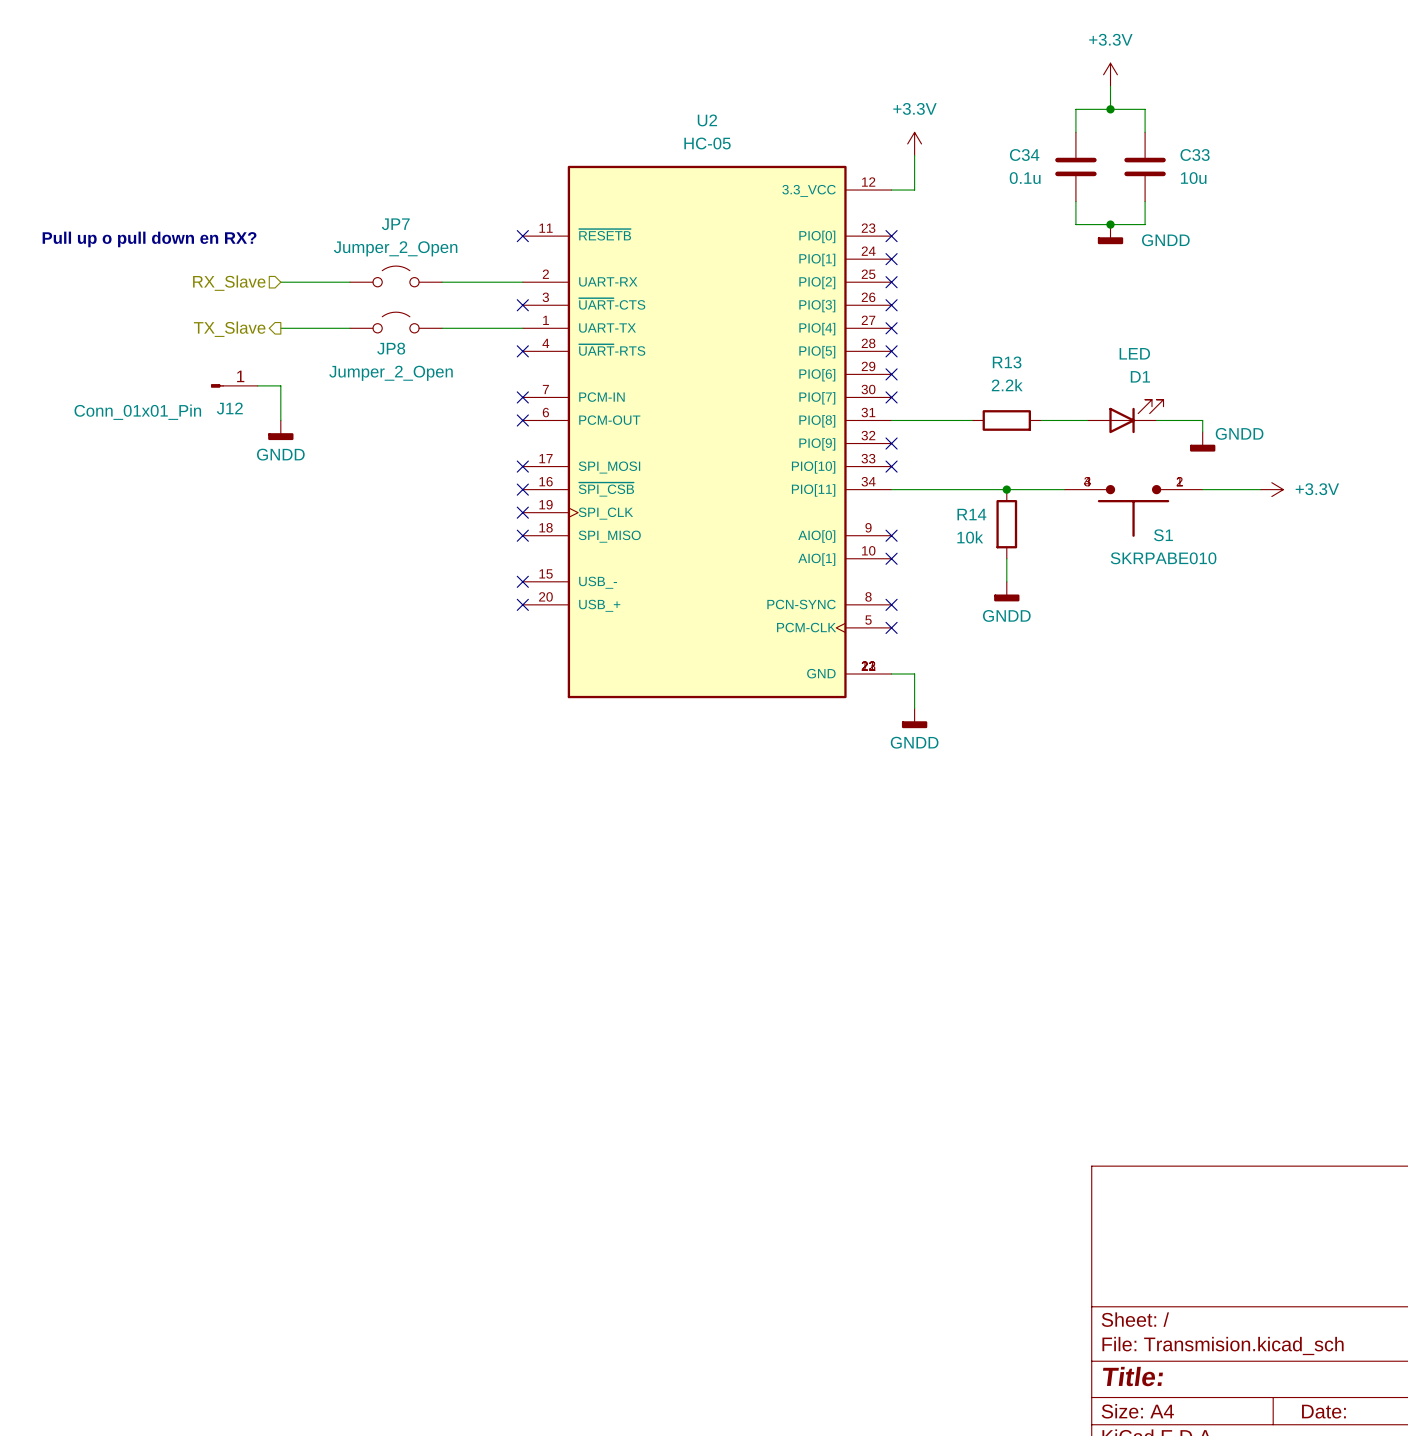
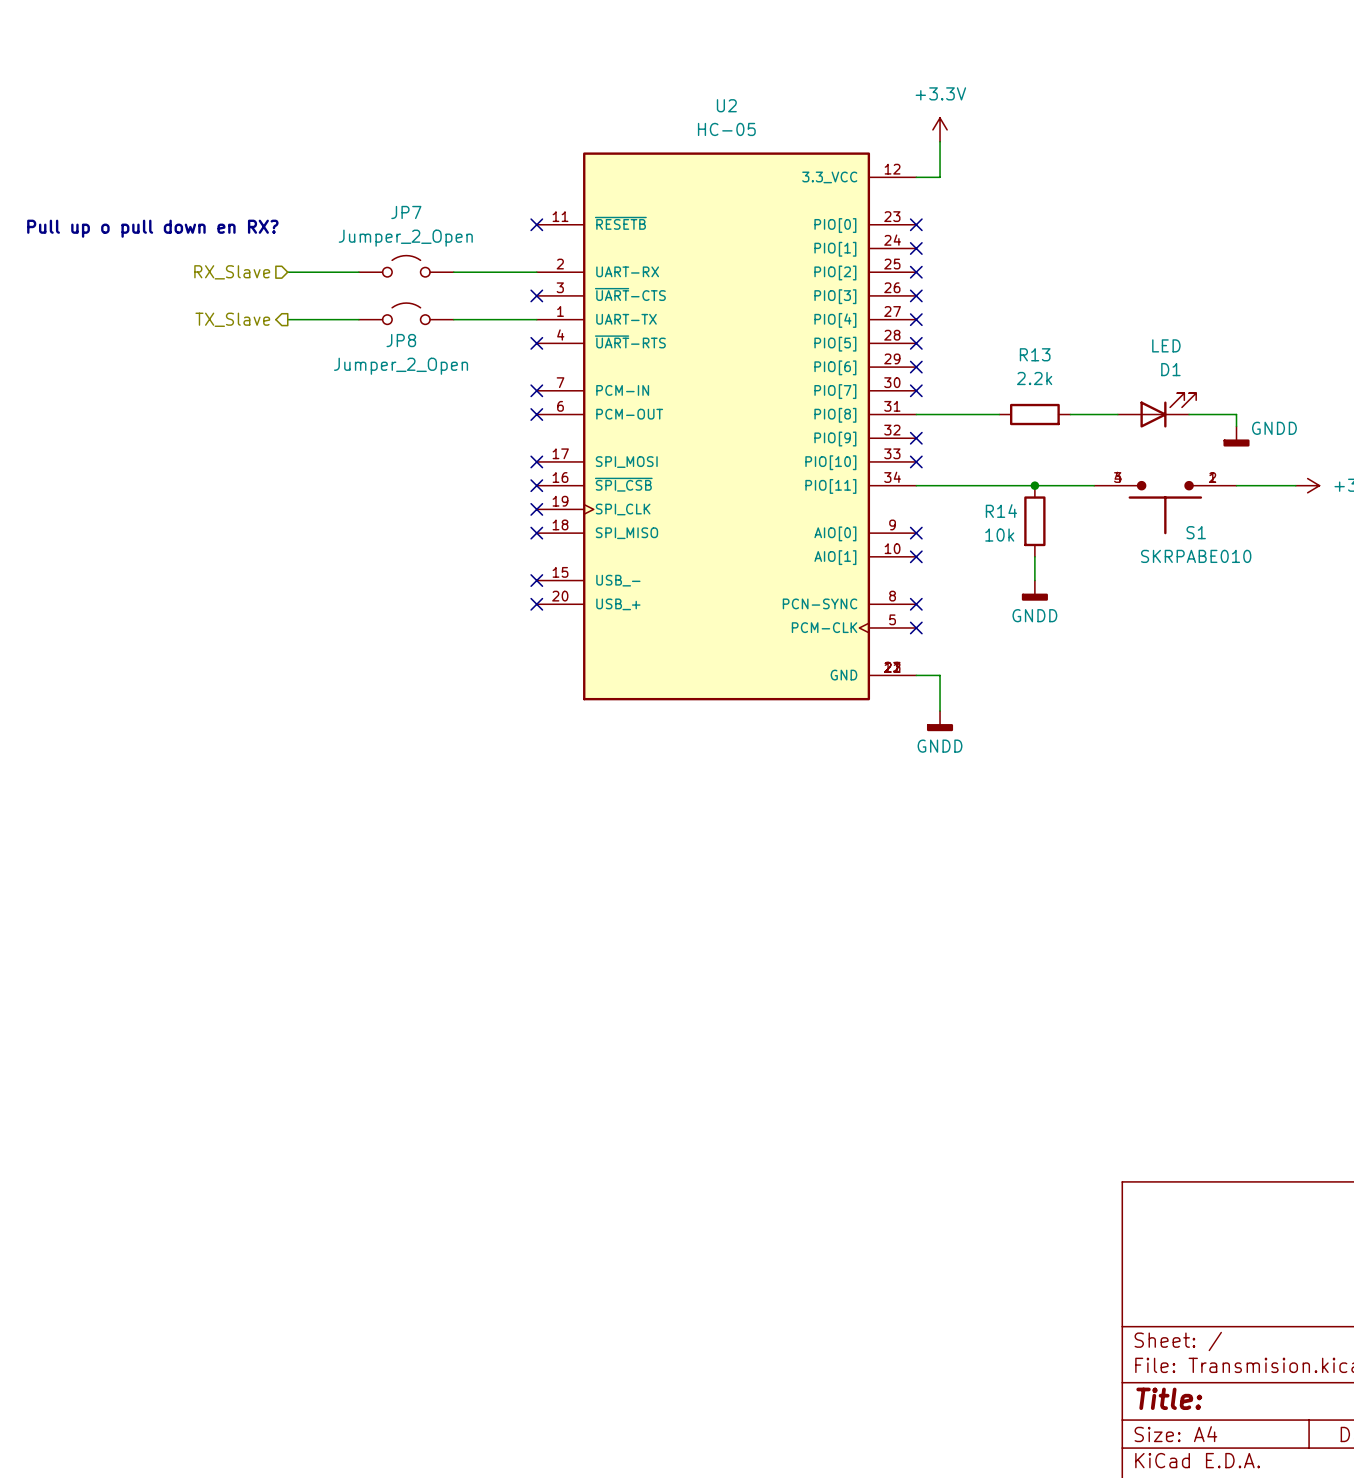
power symbol: +3.3V (1110, 74) -> none
wire: (1110, 86) (1110, 109) -> none
junction: (1110, 109) -> none
wire: (1075, 132) (1075, 109) (1145, 109) (1145, 132) -> none
C34: 0.1u (1075, 166) -> none
C33: 10u (1145, 166) -> none
wire: (1075, 201) (1075, 224) (1145, 224) (1145, 201) -> none
junction: (1110, 224) -> none
power symbol: GNDD (1110, 234) -> none
J12: Conn_01x01_Pin (234, 385) -> none
wire: (257, 385) (280, 385) (280, 420) -> none
power symbol: GNDD (280, 430) -> none

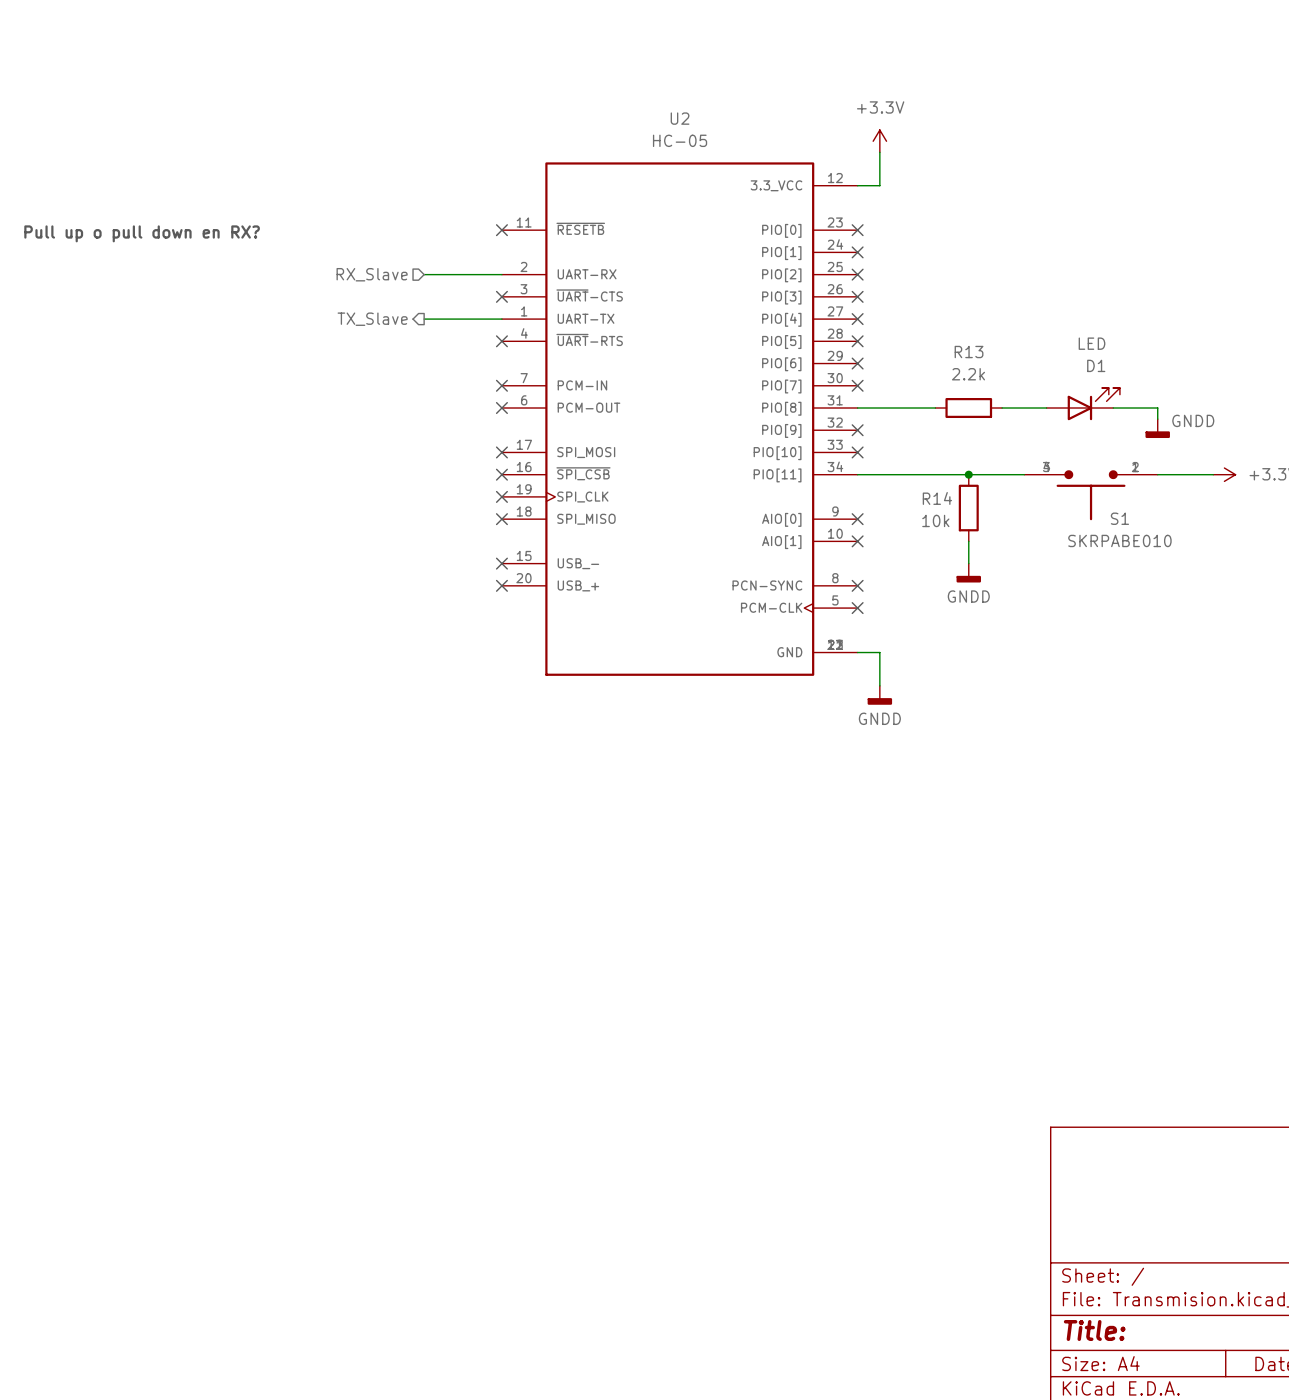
JP7: Jumper_2_Open (406, 266) -> none
hierarchical label position: RX_Slave (232, 272) -> RX_Slave (372, 274)
wire: (287, 272) (358, 272) -> none
JP8: Jumper_2_Open (406, 313) -> none
hierarchical label position: TX_Slave (232, 319) -> TX_Slave (372, 319)
wire: (287, 319) (358, 319) -> none

